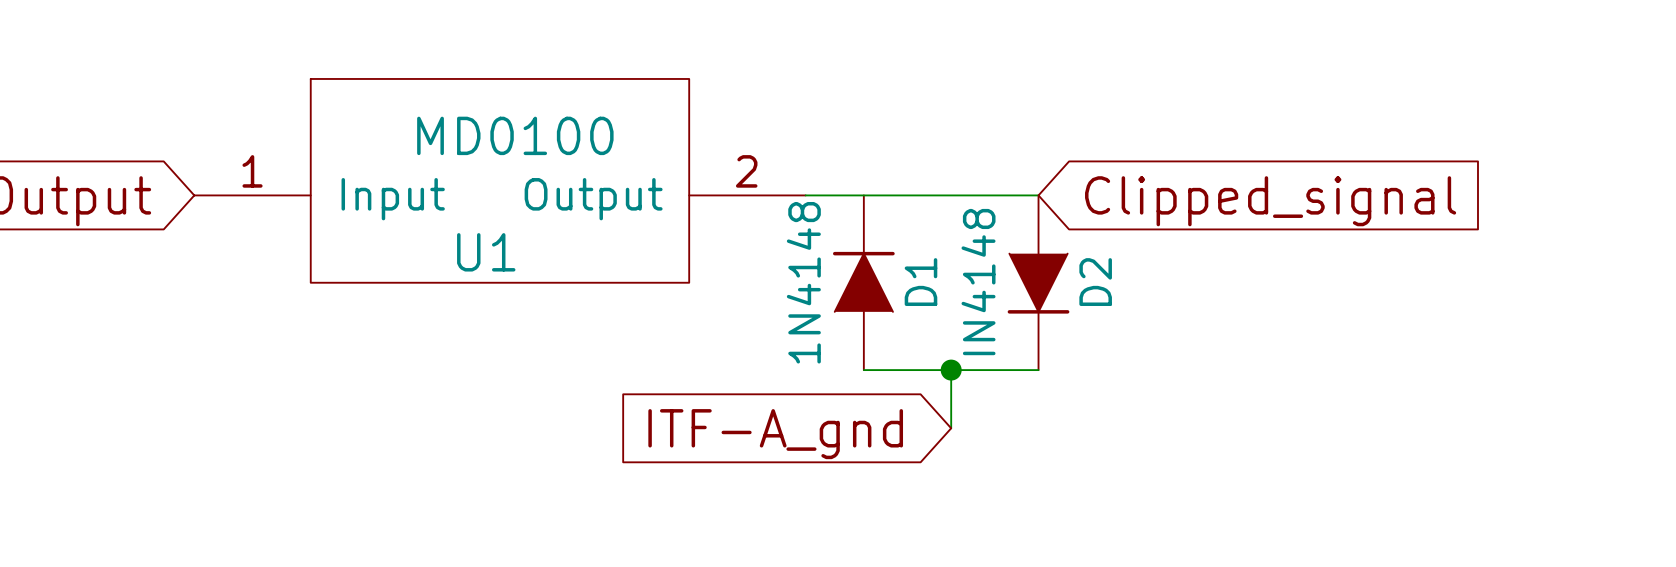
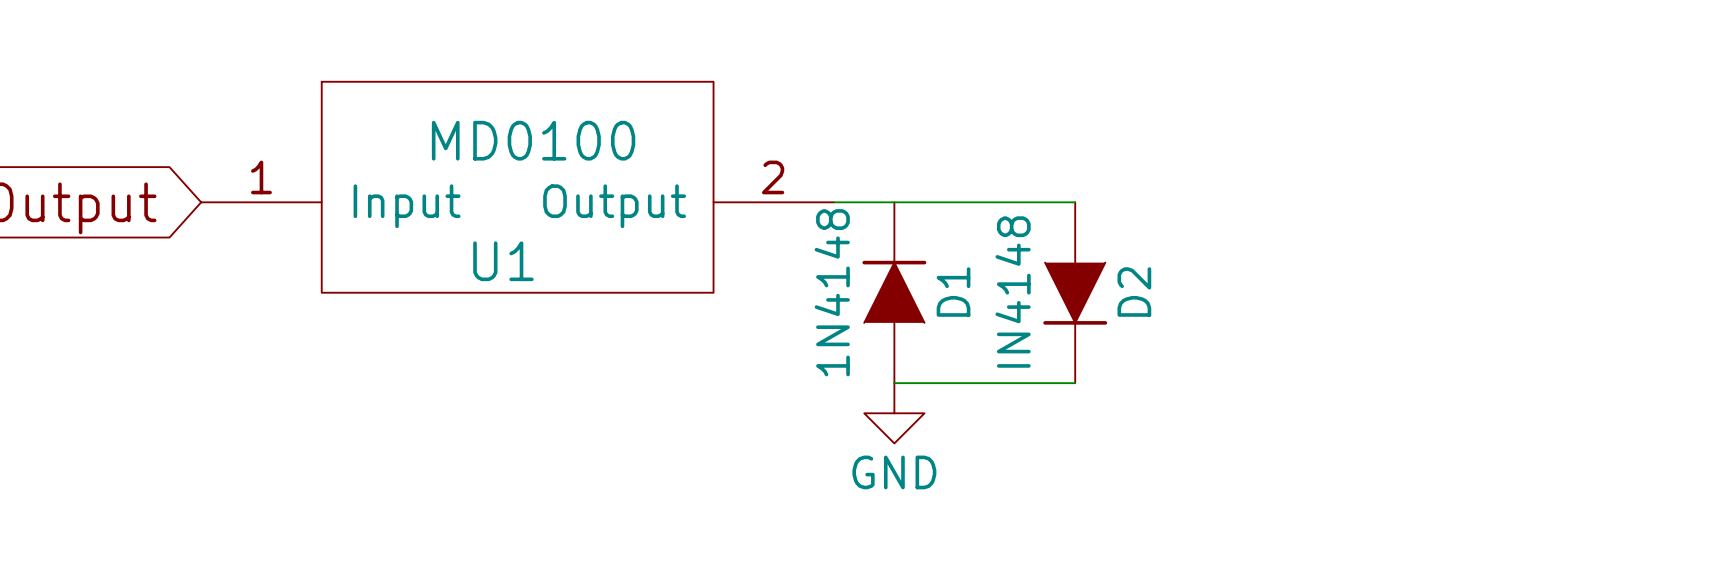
global label: Clipped_signal (1270, 201) -> none
wire: (951, 370) (951, 428) -> none
junction: (951, 370) -> none
power symbol: none -> GND (894, 413)
global label: ITF-A_gnd (775, 434) -> none

